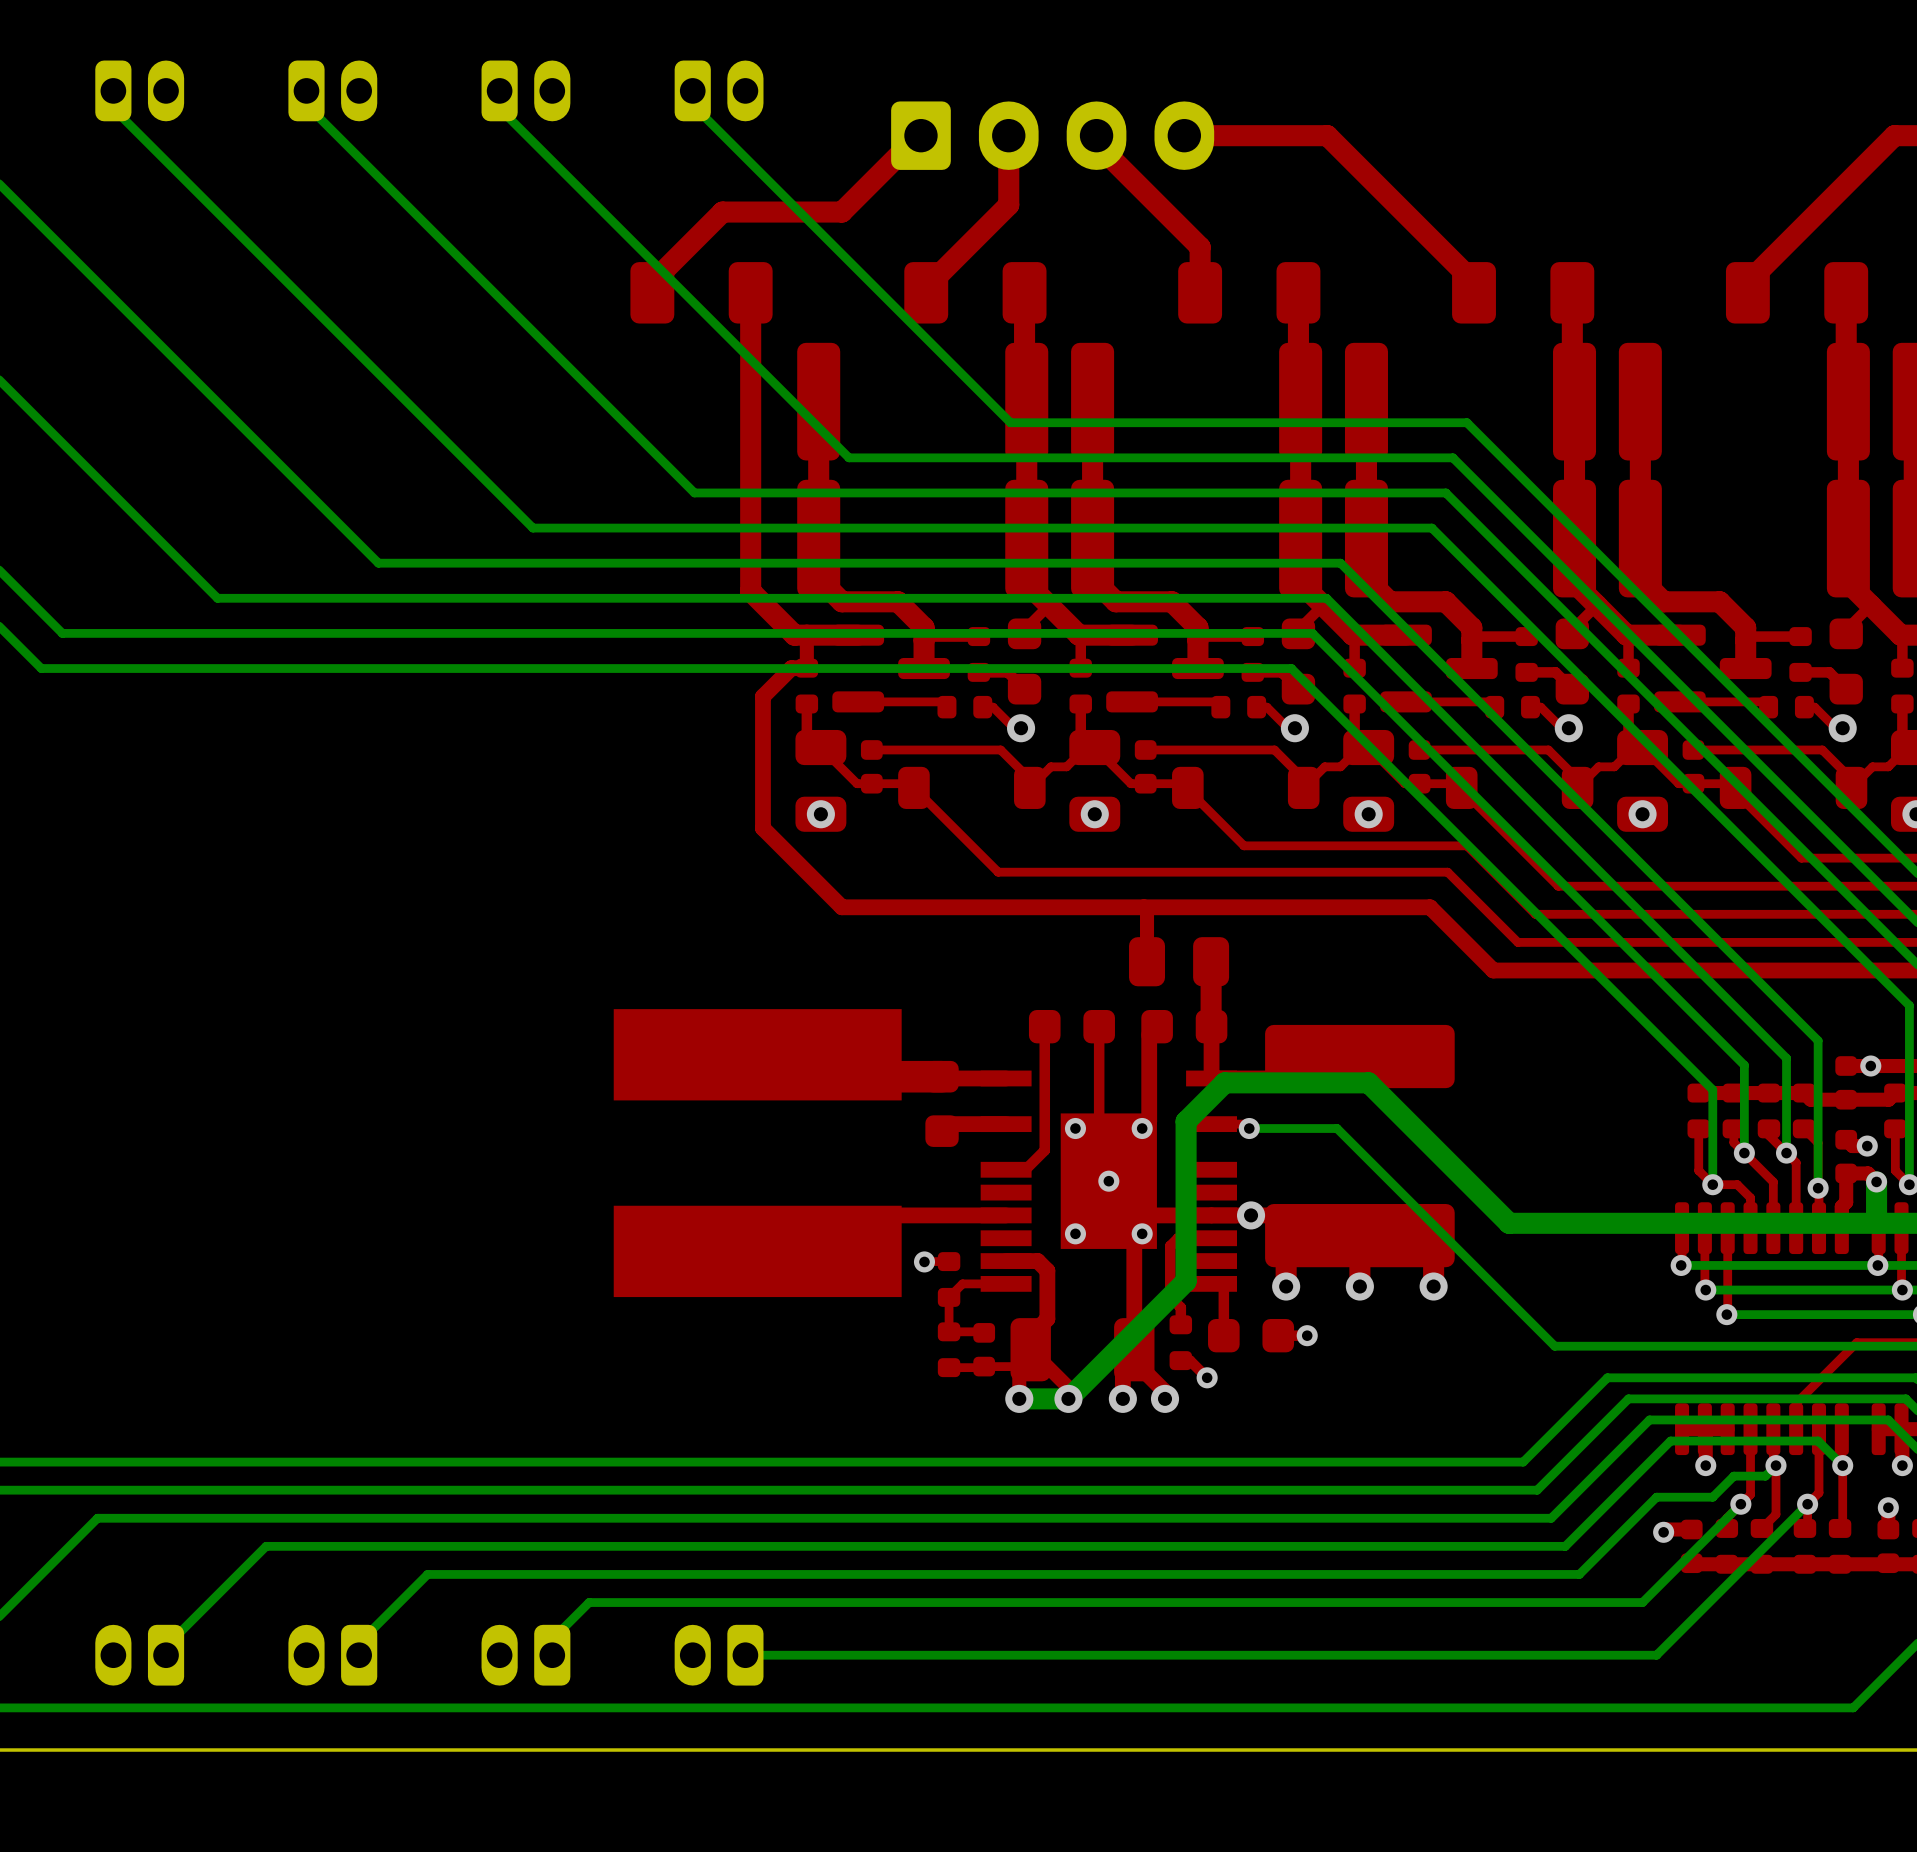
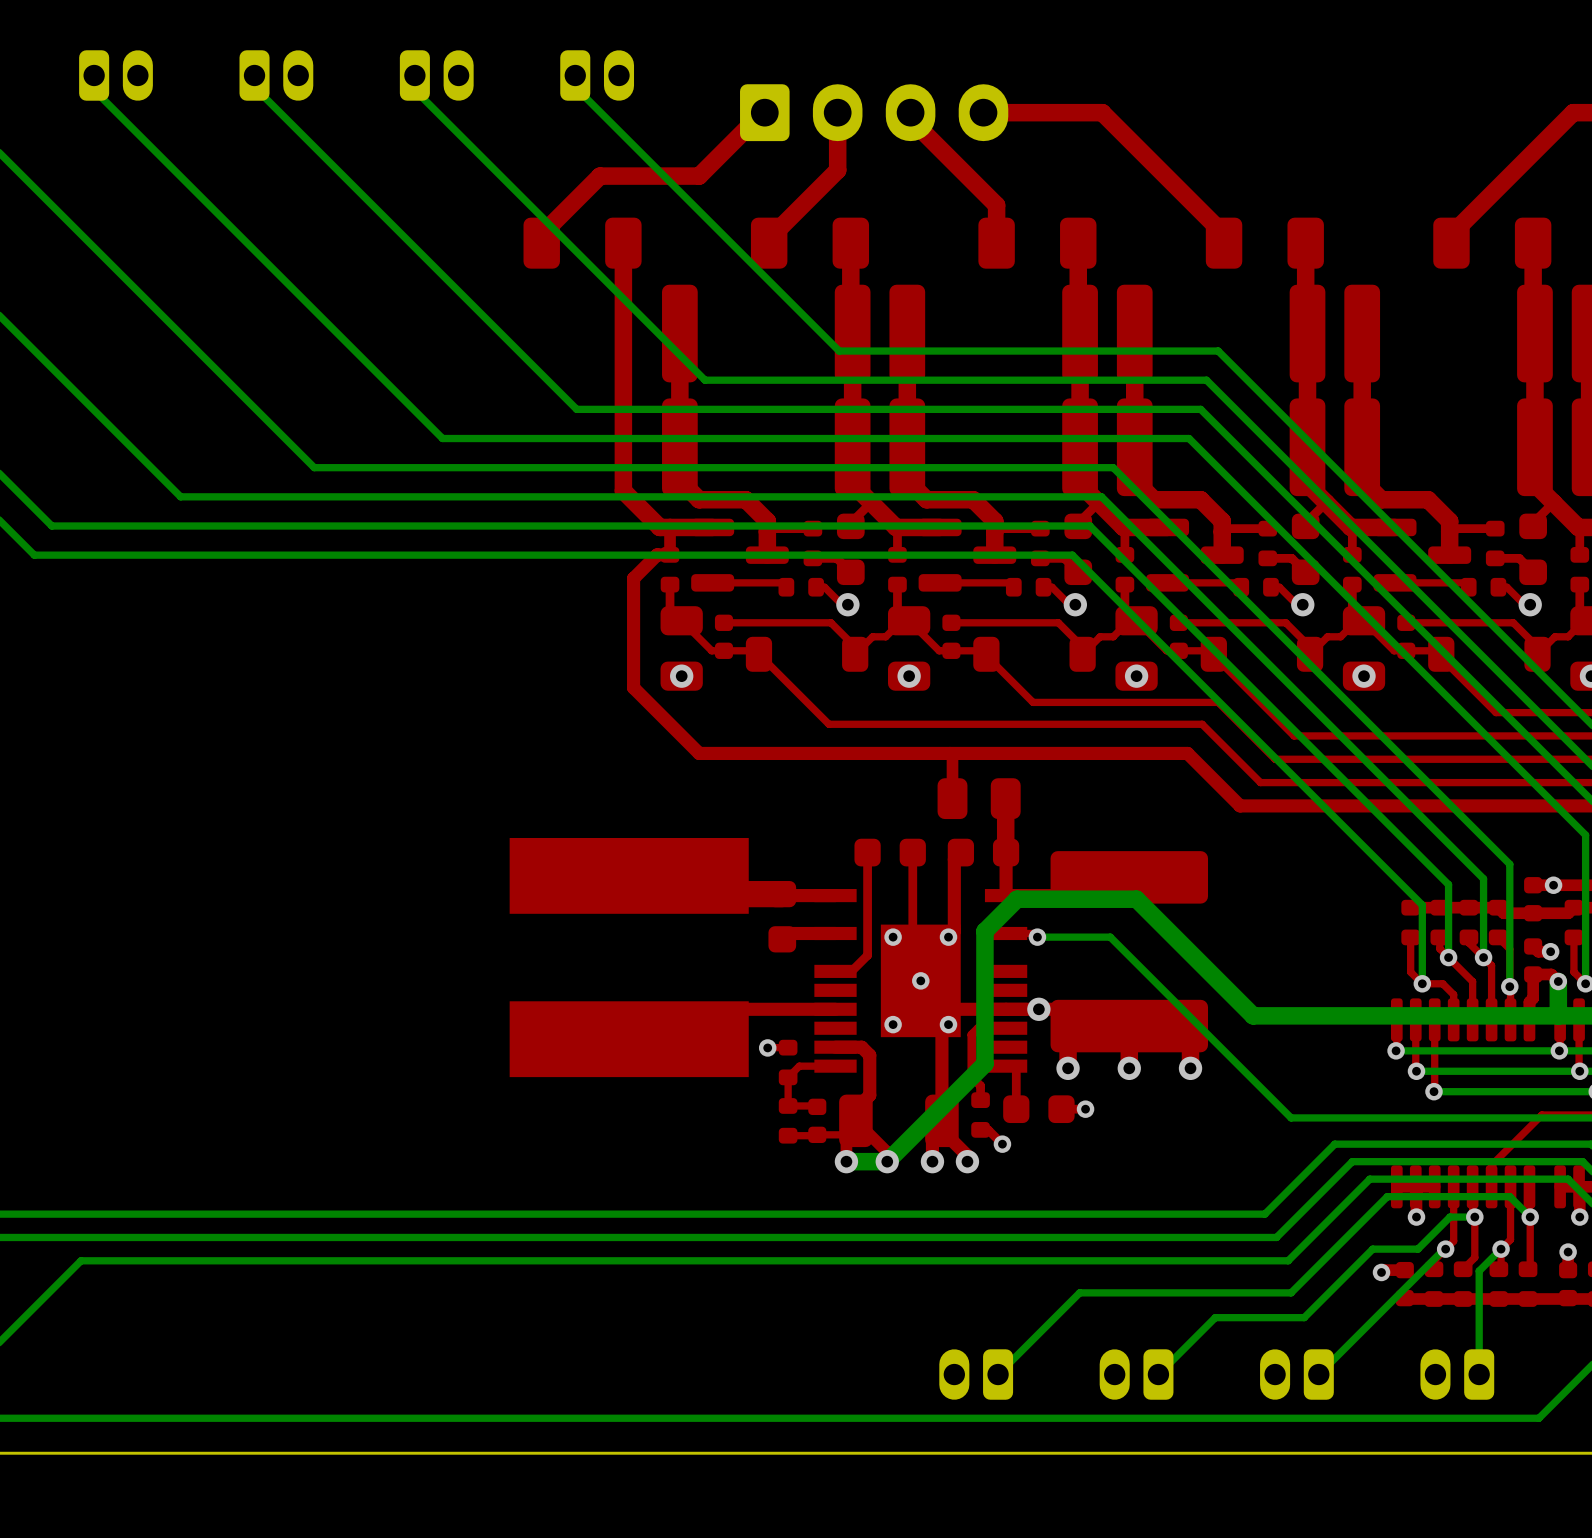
bottom track: (1775, 1465) (1765, 1476) (1733, 1476) (1712, 1497) (1656, 1497) (1579, 1574) (427, 1574) (359, 1642) (359, 1655) -> (1474, 1217) (1450, 1217) (1417, 1249) (1372, 1249) (1304, 1317) (1215, 1317) (1158, 1374)
bottom track: (1740, 1504) (1642, 1602) (589, 1602) (552, 1639) (552, 1655) -> (1445, 1249) (1318, 1374)
bottom track: (1781, 1530) (1656, 1655) (745, 1655) -> (1479, 1271) (1479, 1374)
bottom track: (1565, 1546) (266, 1546) (166, 1646) (166, 1655) -> (1299, 1284) (1291, 1292) (1079, 1292) (998, 1374)
part: (139, 1655) -> none
part: (332, 1655) -> none
part: (525, 1655) -> none
part: (719, 1655) -> none
part: none -> (976, 1374)
part: none -> (1136, 1374)
part: none -> (1296, 1374)
part: none -> (1457, 1374)

